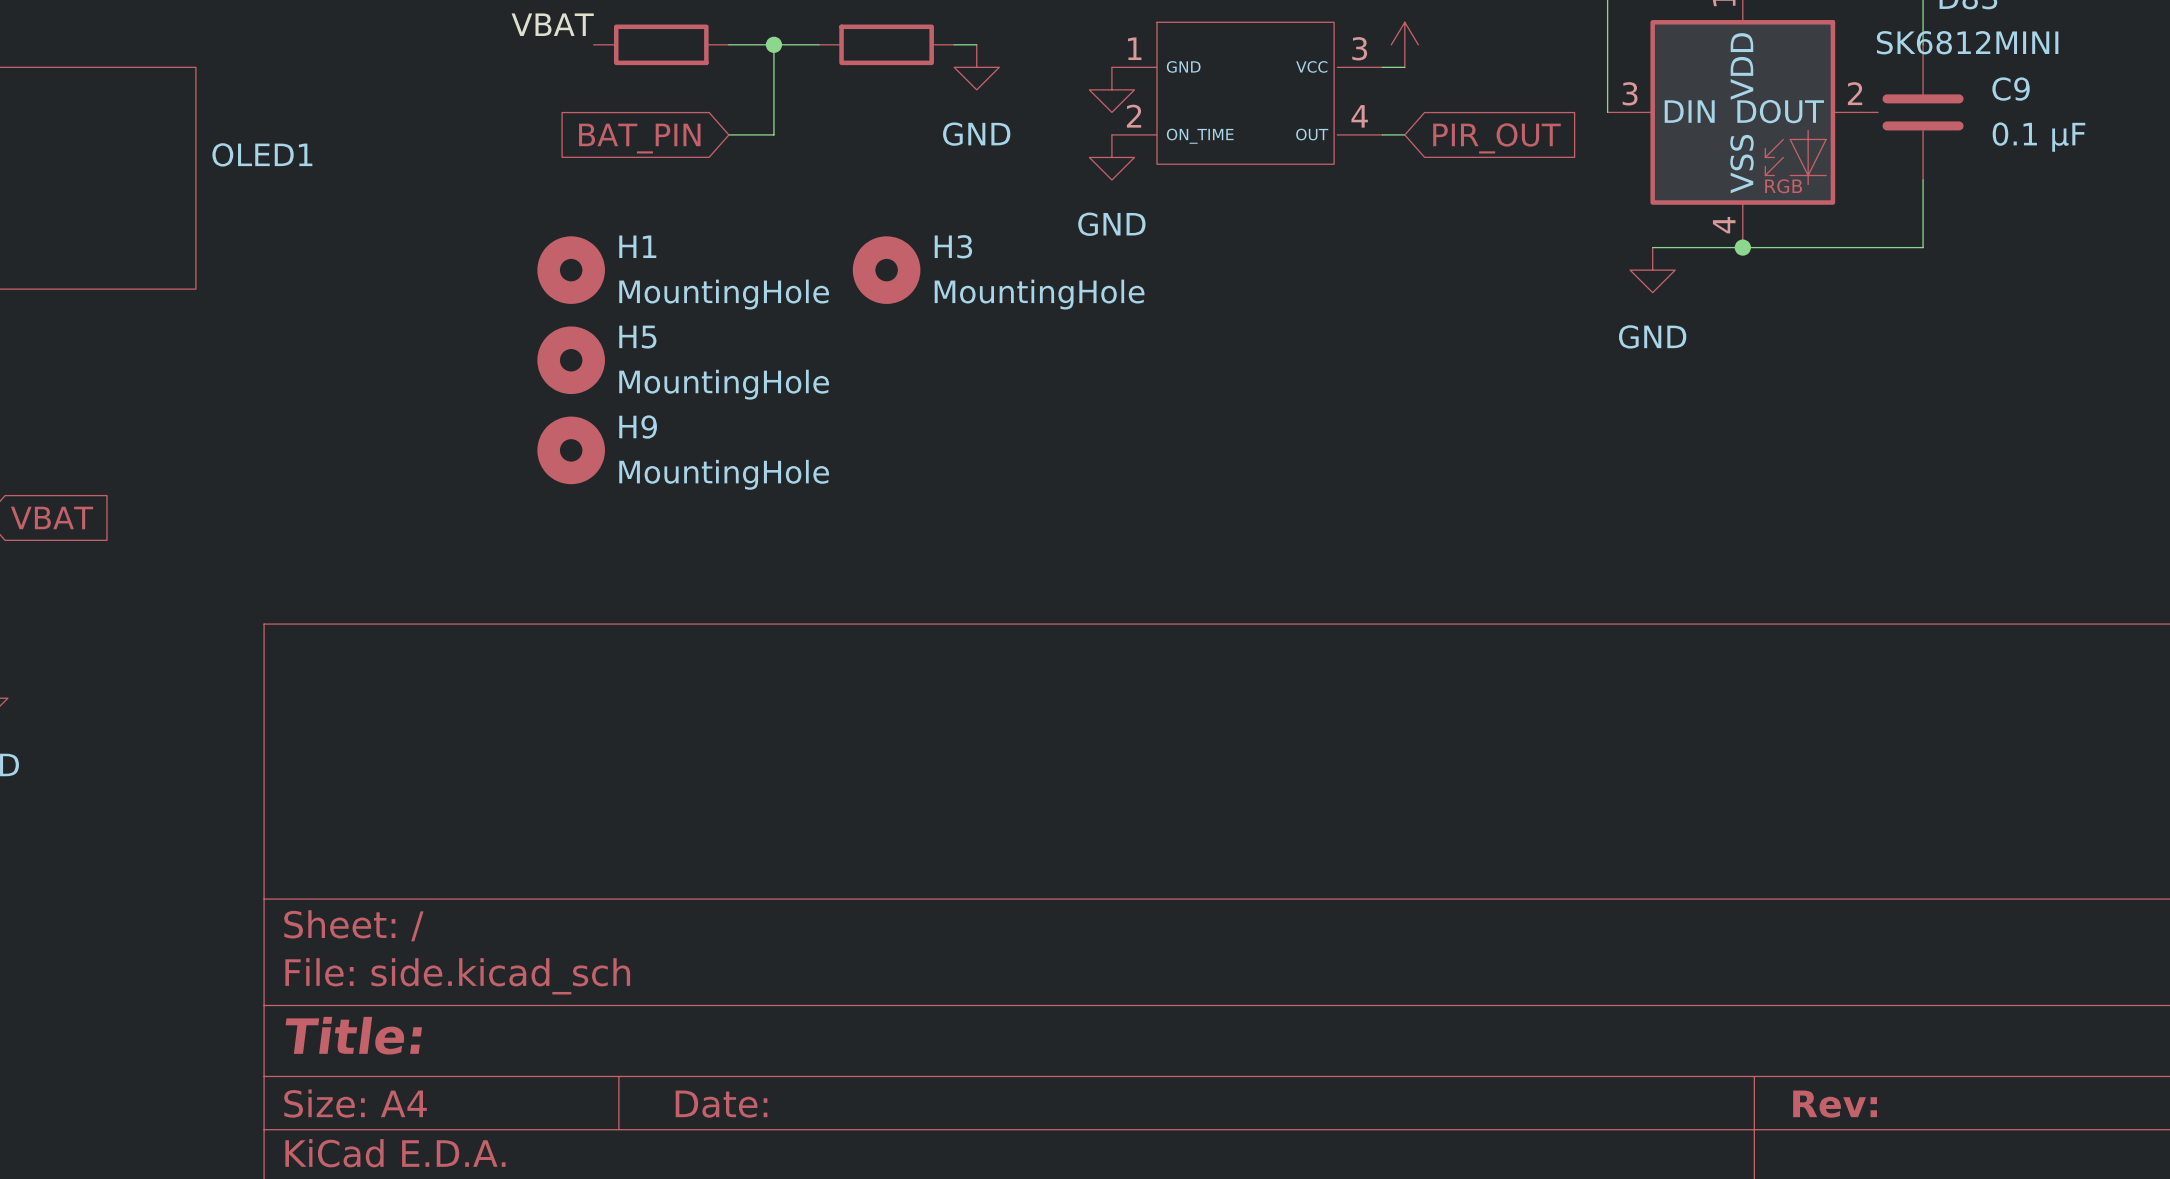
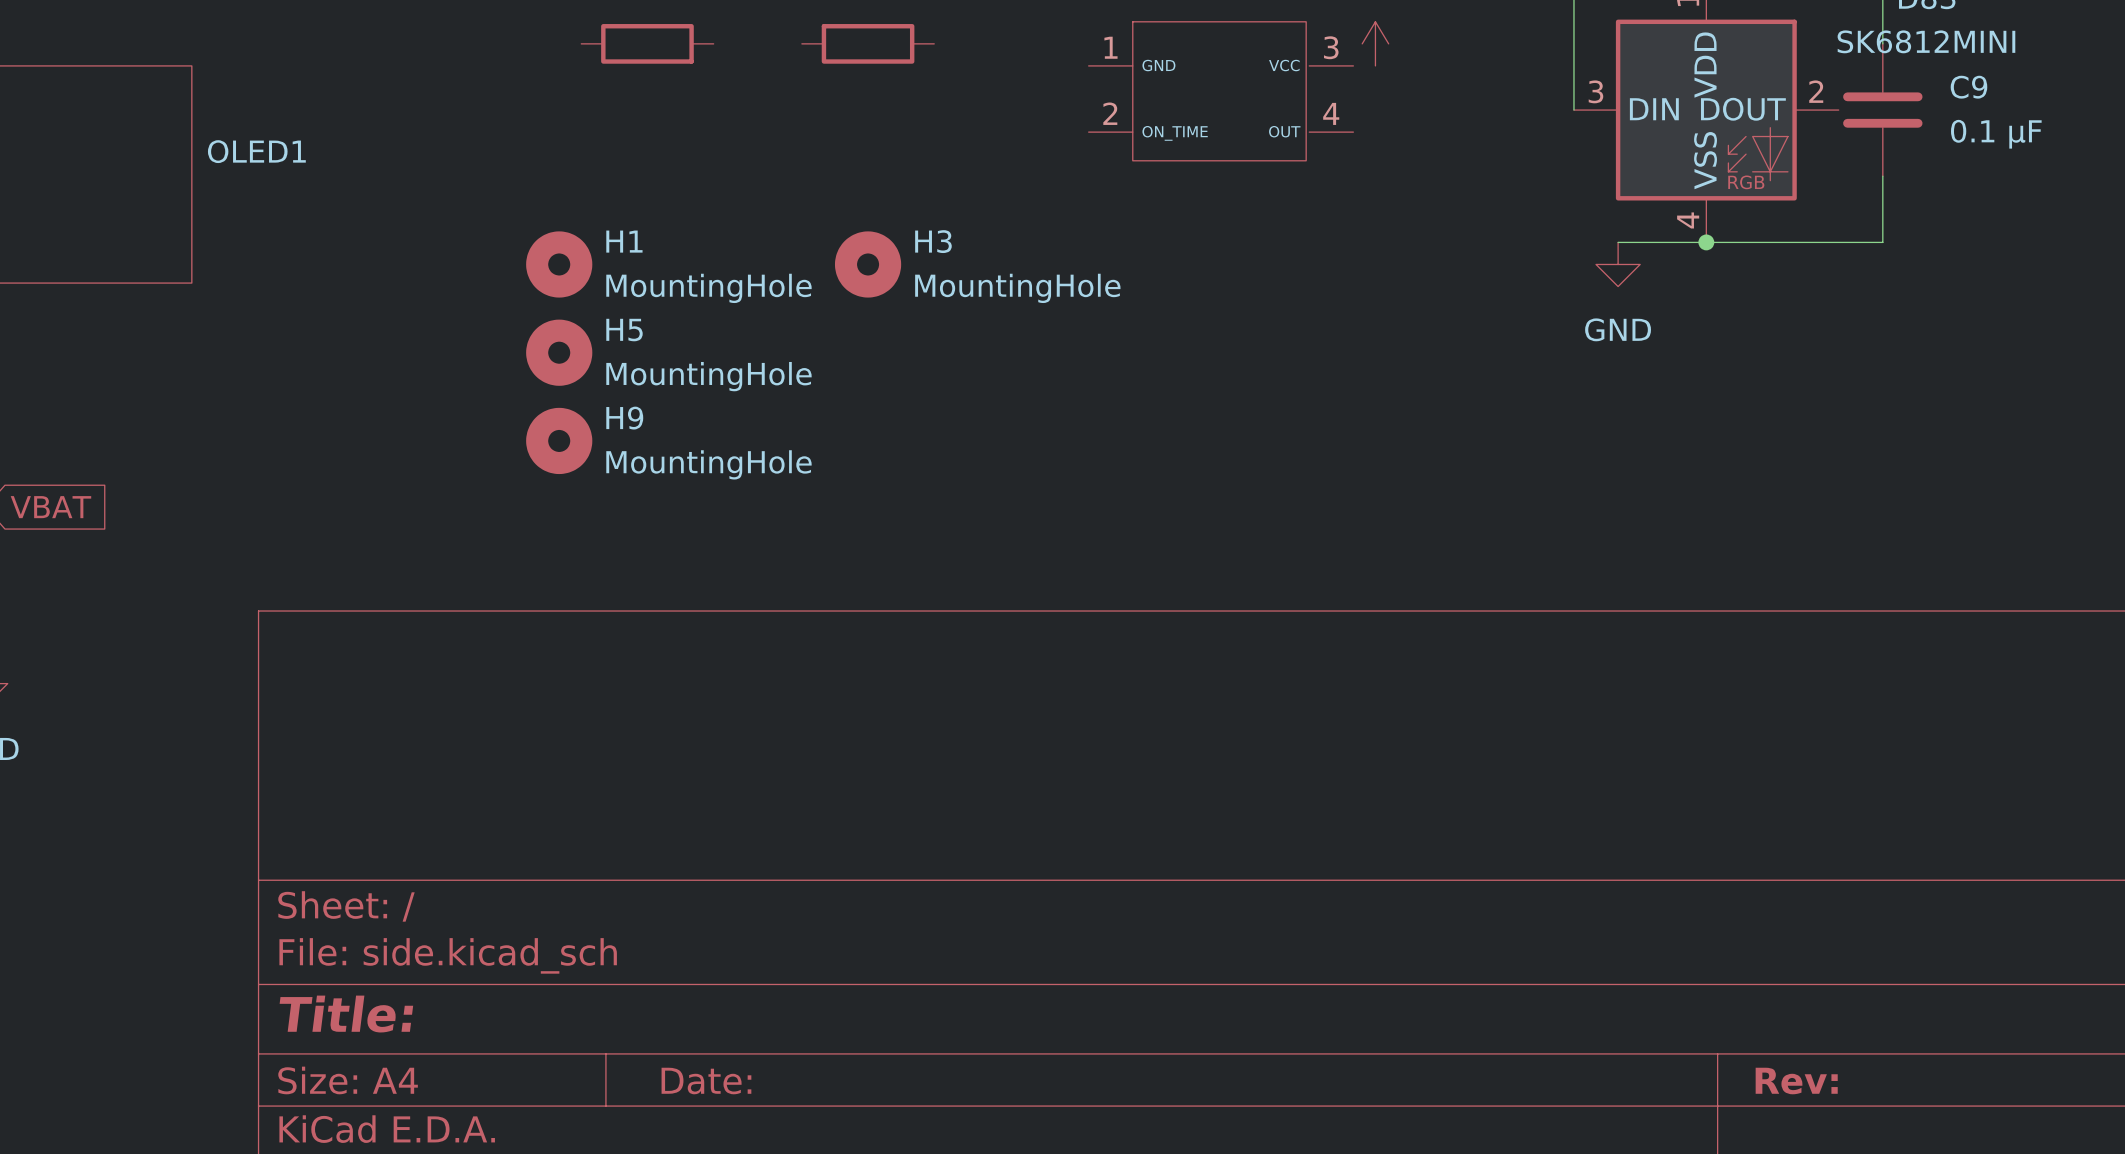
label: VBAT (552, 24) -> none
wire: (728, 44) (819, 44) -> none
wire: (773, 44) (773, 134) (728, 134) -> none
junction: (773, 44) -> none
wire: (954, 44) (976, 44) -> none
power symbol: GND (976, 67) -> none
wire: (1382, 67) (1404, 67) -> none
power symbol: (1111, 89) -> none
wire: (1382, 134) (1404, 134) -> none
global label: BAT_PIN (639, 138) -> none
global label: PIR_OUT (1496, 138) -> none
power symbol: GND (1111, 157) -> none

